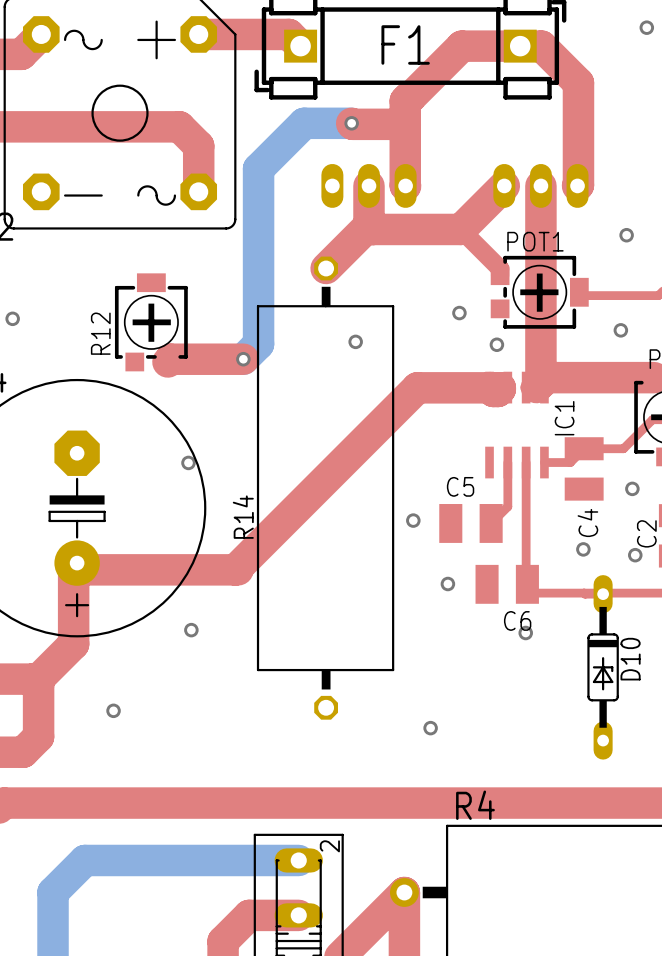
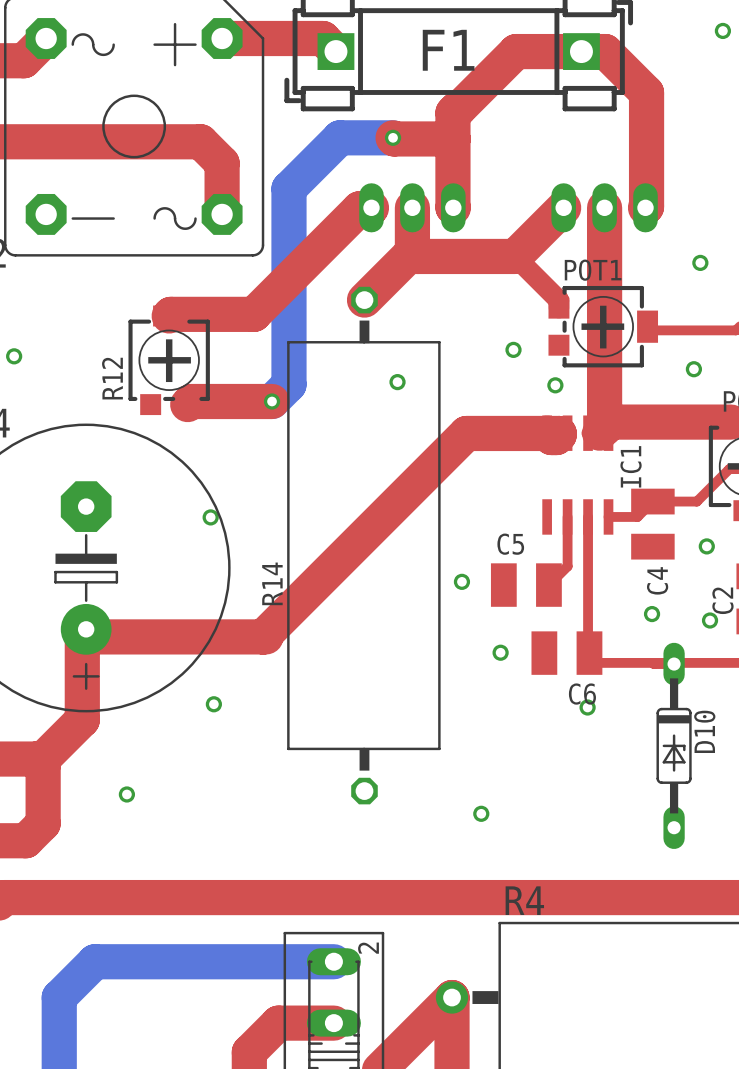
top track: none -> (371, 207) (359, 208) (253, 314) (170, 314) (169, 315)

